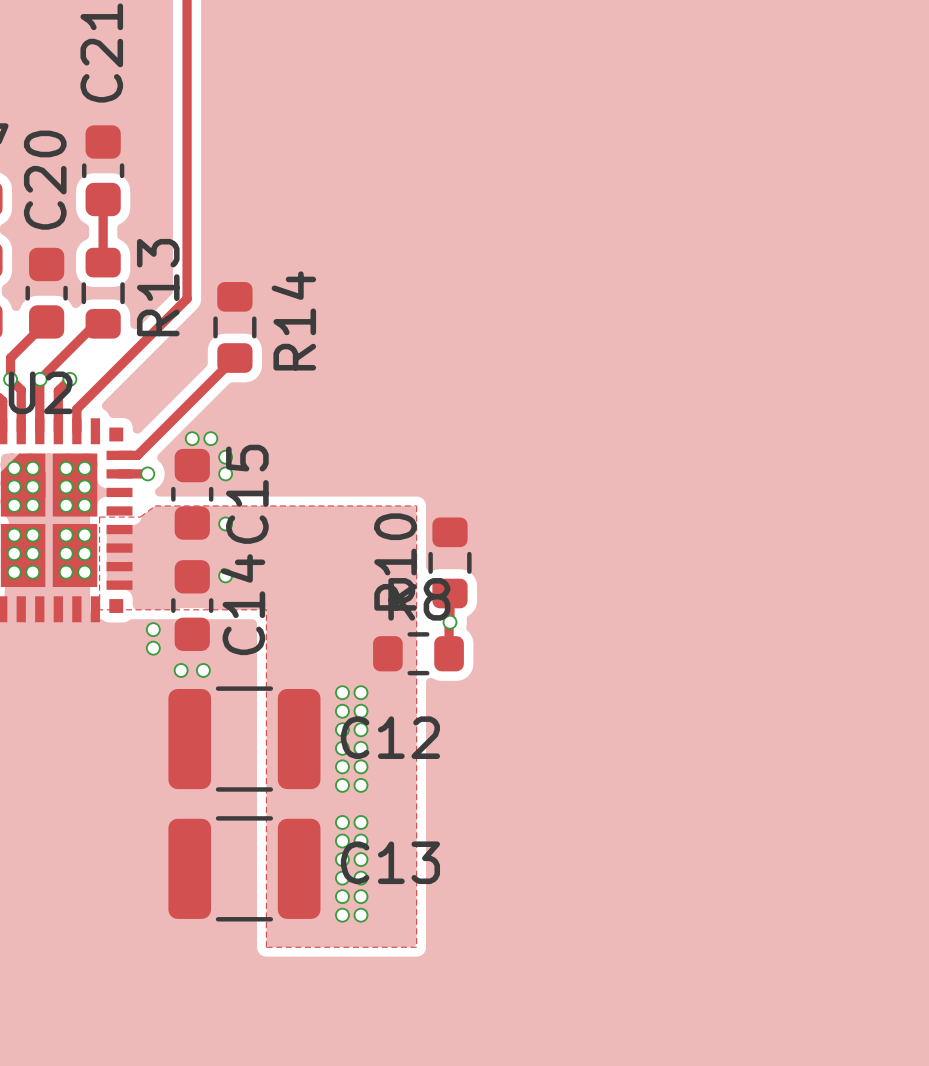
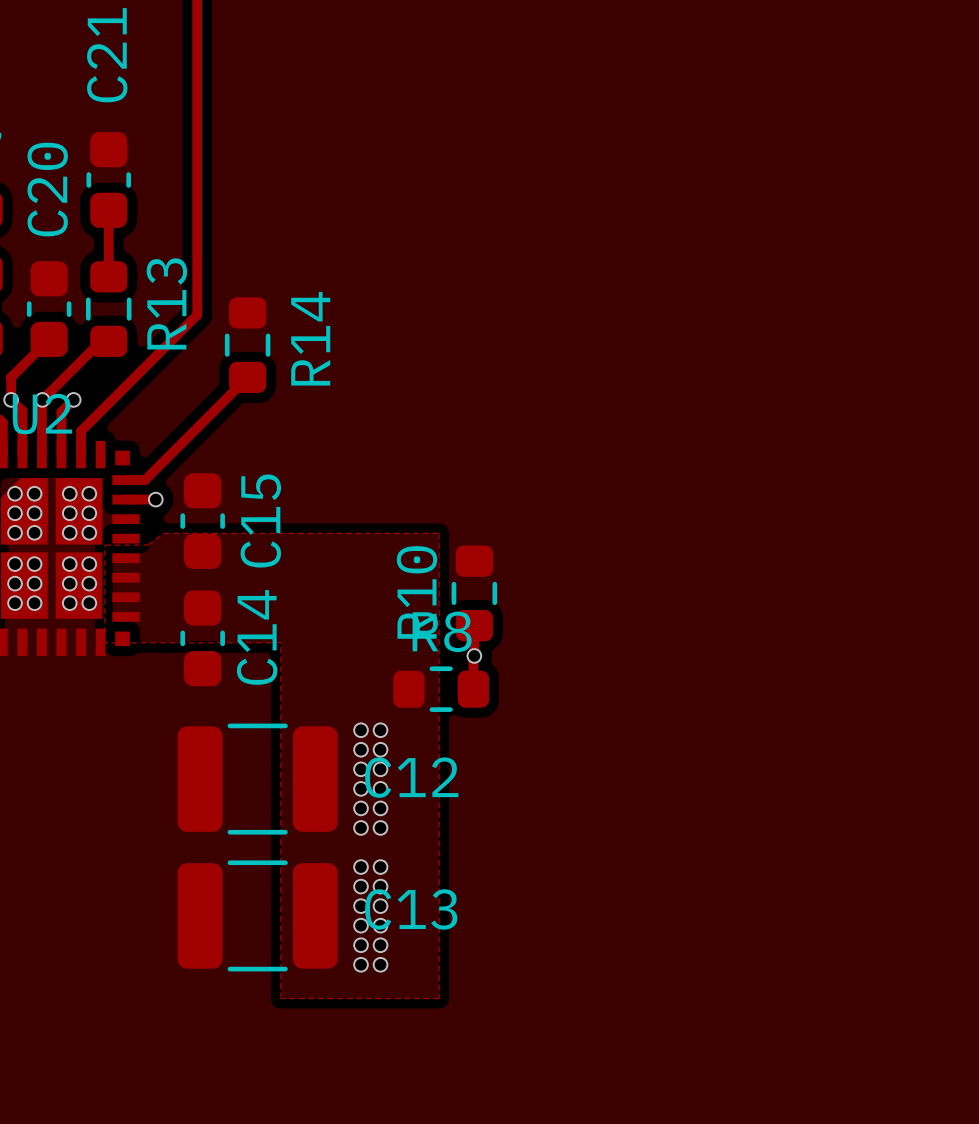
via: (192, 438) -> none
via: (210, 438) -> none
via: (225, 457) -> none
via: (225, 473) -> none
via: (225, 523) -> none
via: (225, 575) -> none
via: (153, 629) -> none
via: (153, 648) -> none
via: (181, 670) -> none
via: (203, 670) -> none

